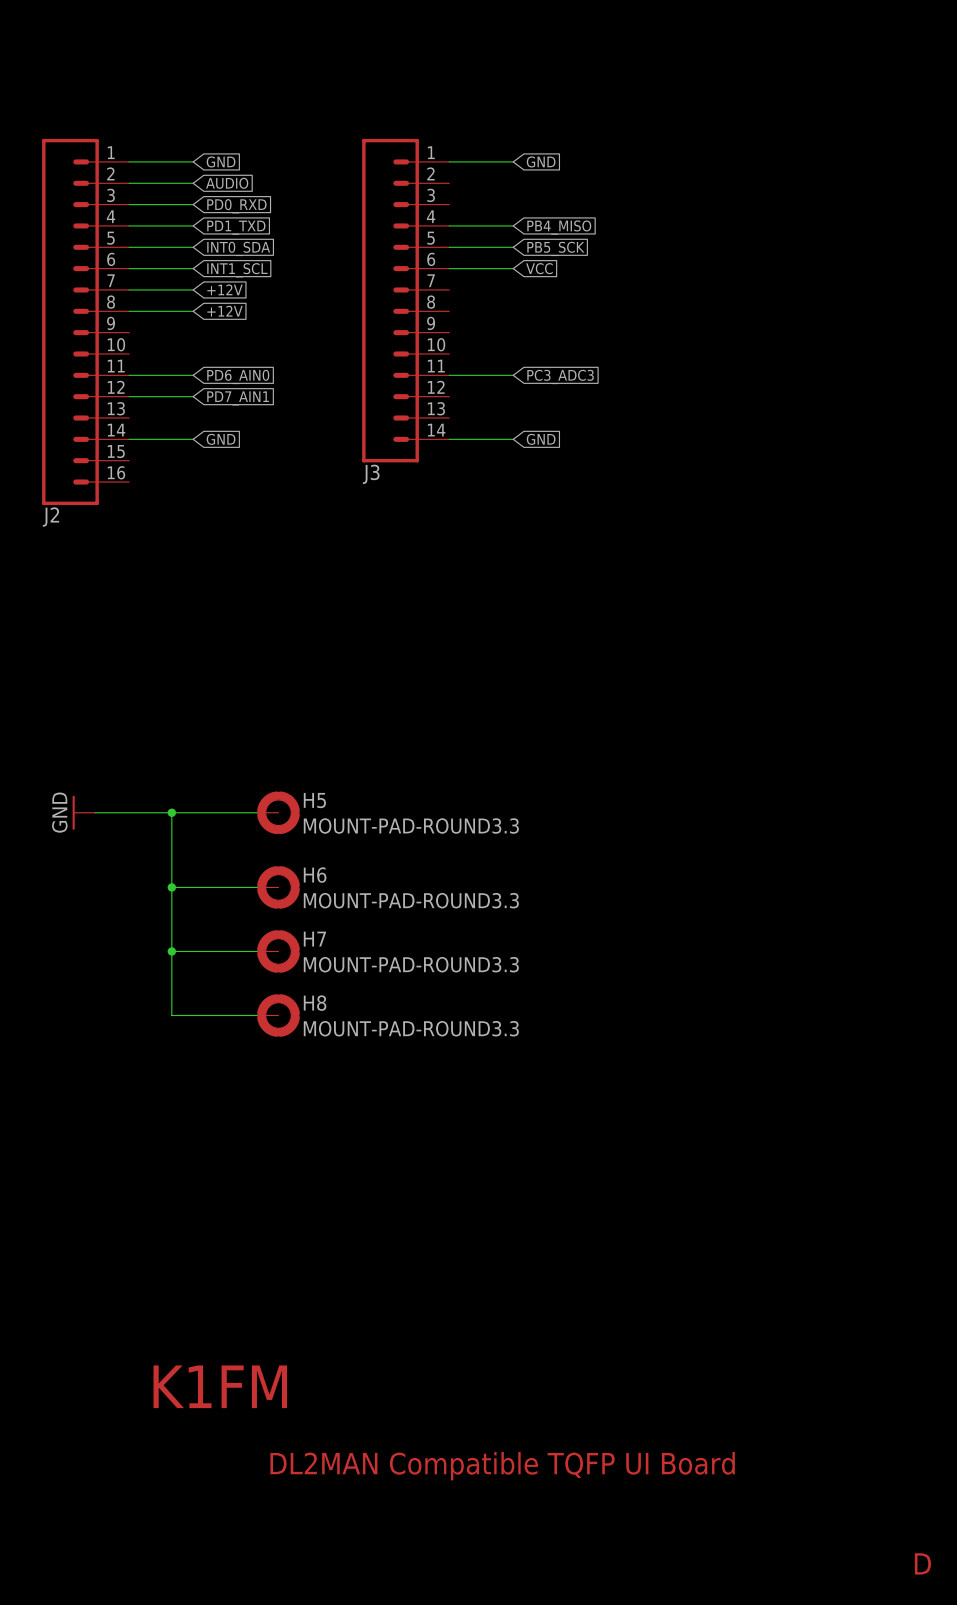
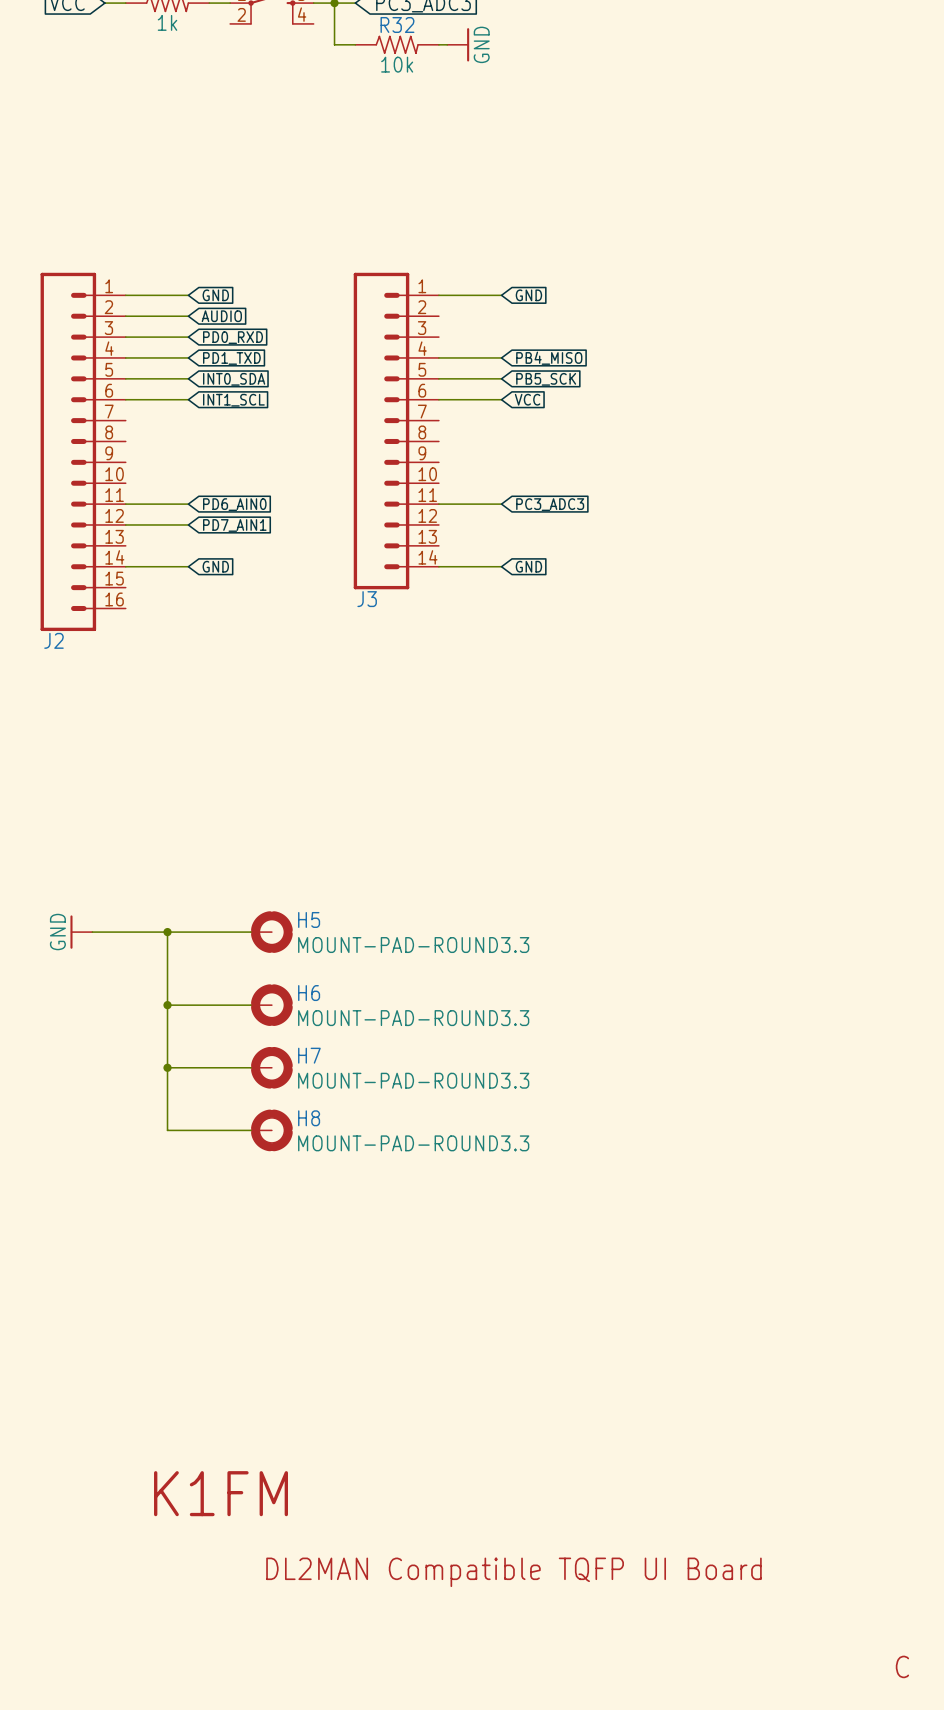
wire: (129, 289) (193, 289) -> none
global label: +12V (225, 289) -> none
wire: (129, 311) (193, 311) -> none
global label: +12V (225, 311) -> none
text: D (922, 1563) -> C (902, 1666)

